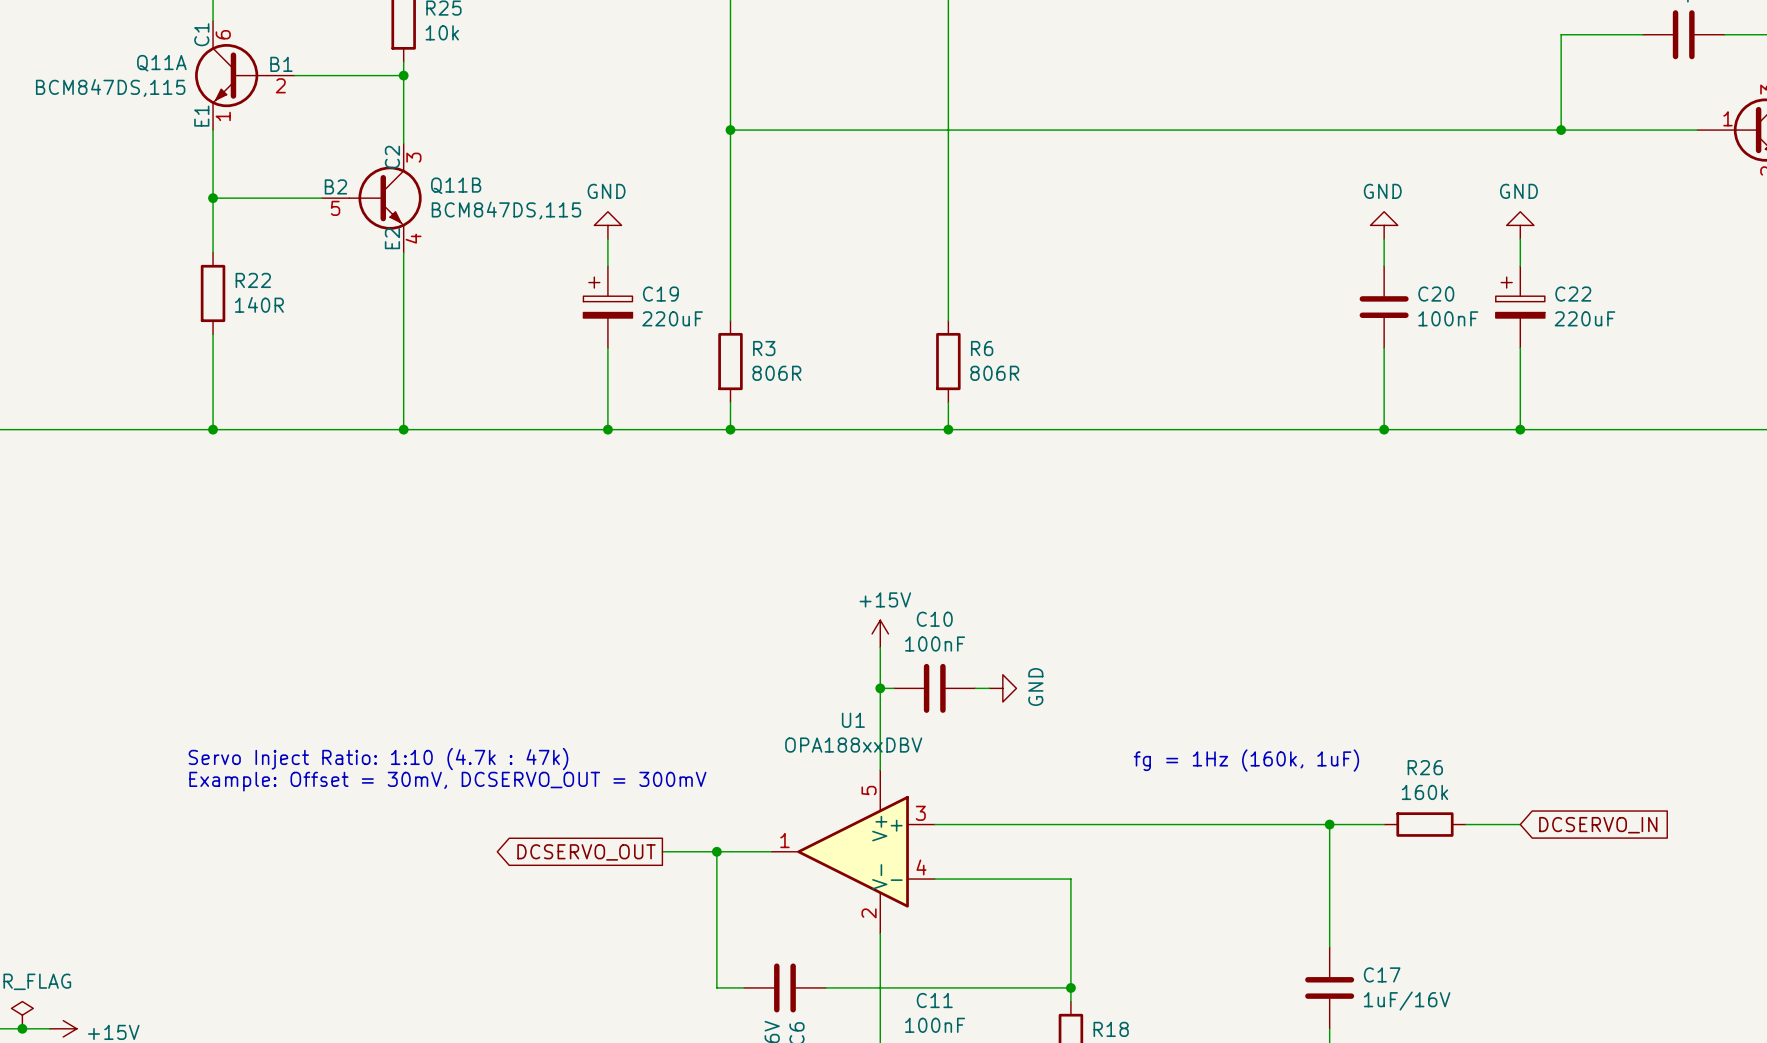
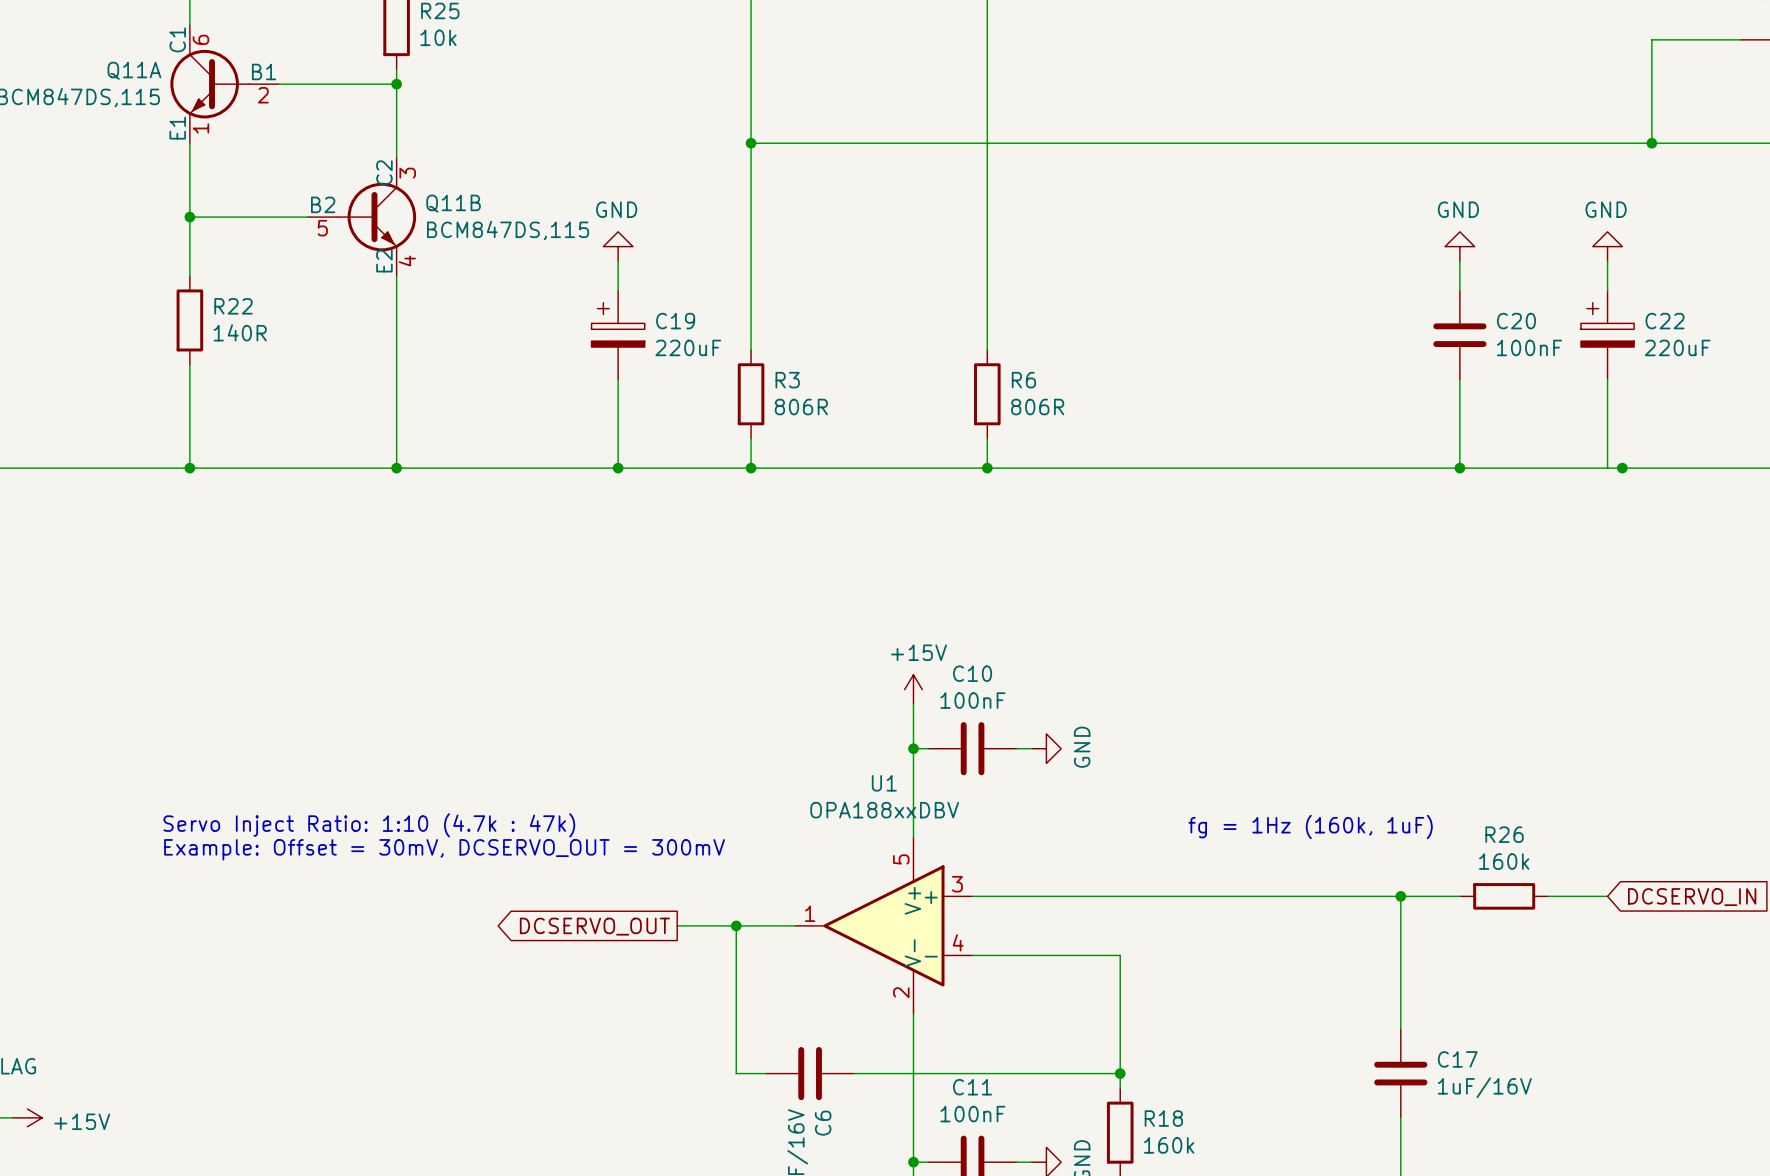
junction position: (1520, 429) -> (1622, 468)

